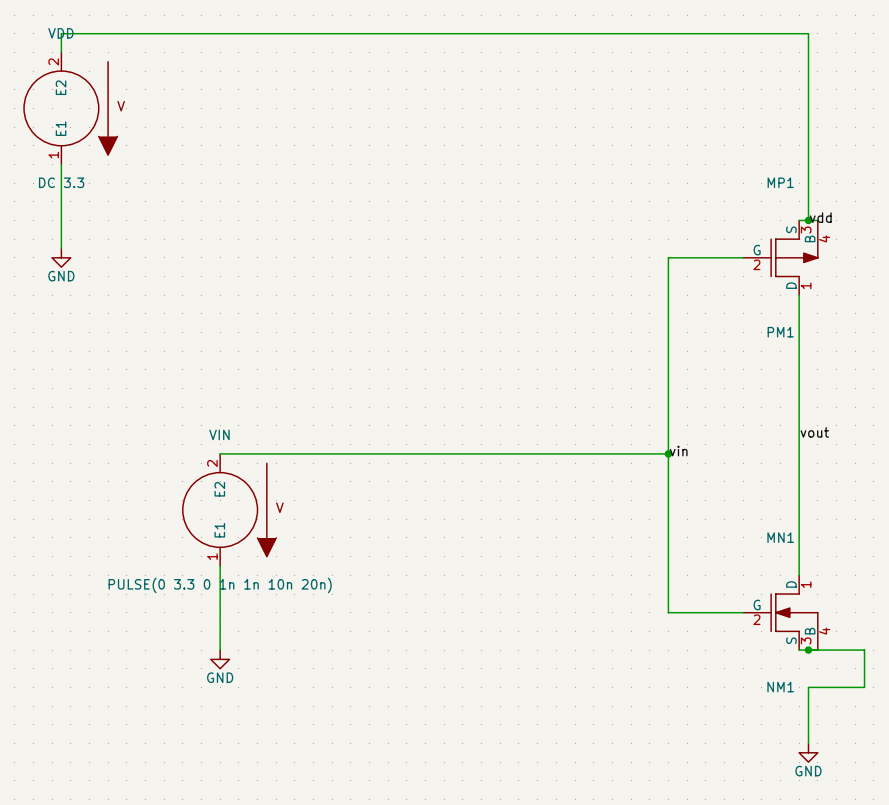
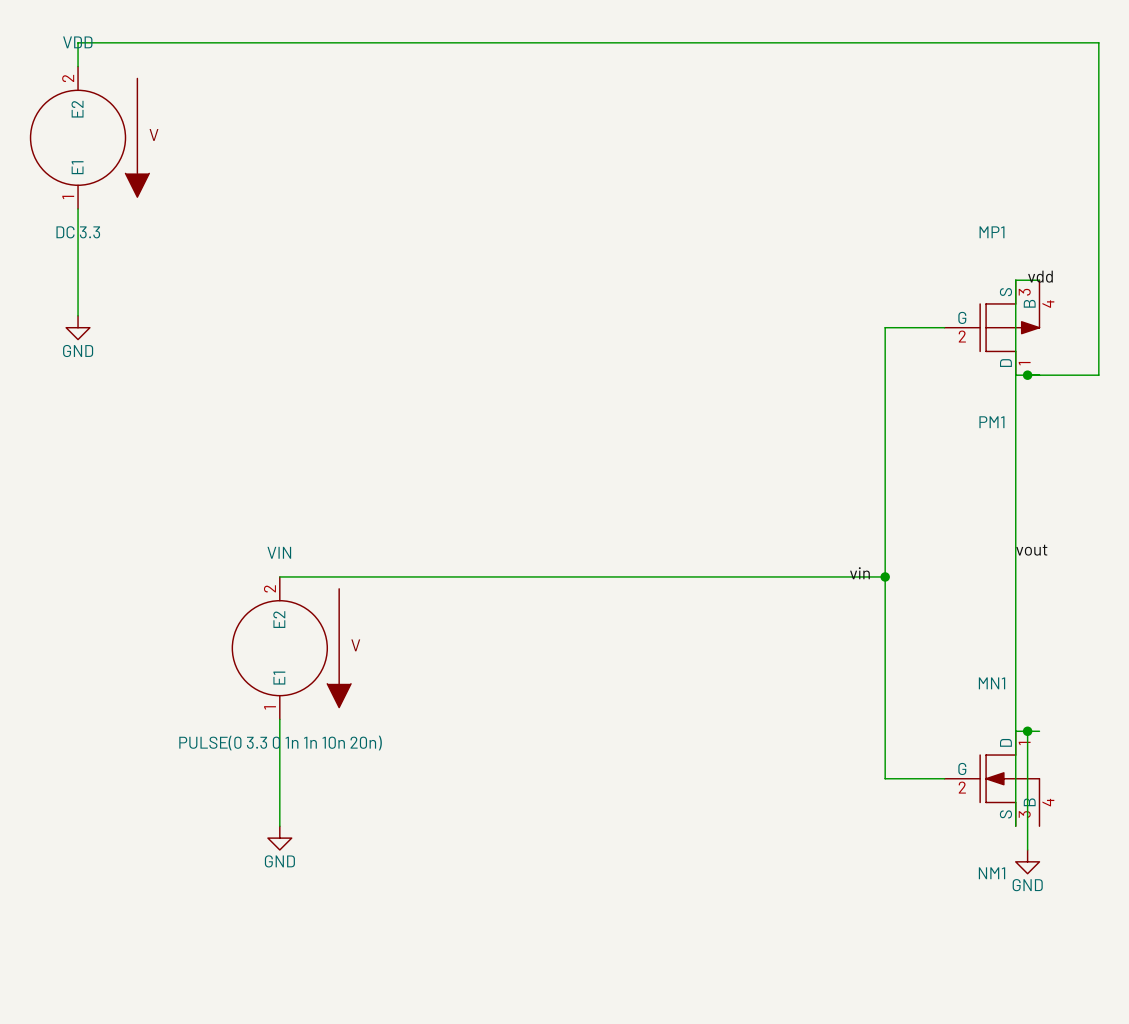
wire: (808, 33) (808, 220) -> (1027, 42) (1098, 42) (1098, 375) (1015, 375) (1015, 280)
junction: (808, 220) -> none
wire: (696, 257) (668, 257) (668, 612) (696, 612) -> (885, 327) (885, 778)
junction: none -> (1027, 375)
wire: none -> (849, 576) (885, 576)
junction position: (668, 453) -> (885, 576)
wire: none -> (1027, 731) (1027, 849)
junction: none -> (1027, 731)
wire: (799, 650) (864, 650) (864, 687) (808, 687) (808, 743) -> (1015, 826) (1015, 731) (1039, 731)
junction: (808, 650) -> none
power symbol position: GND (808, 752) -> GND (1027, 861)

